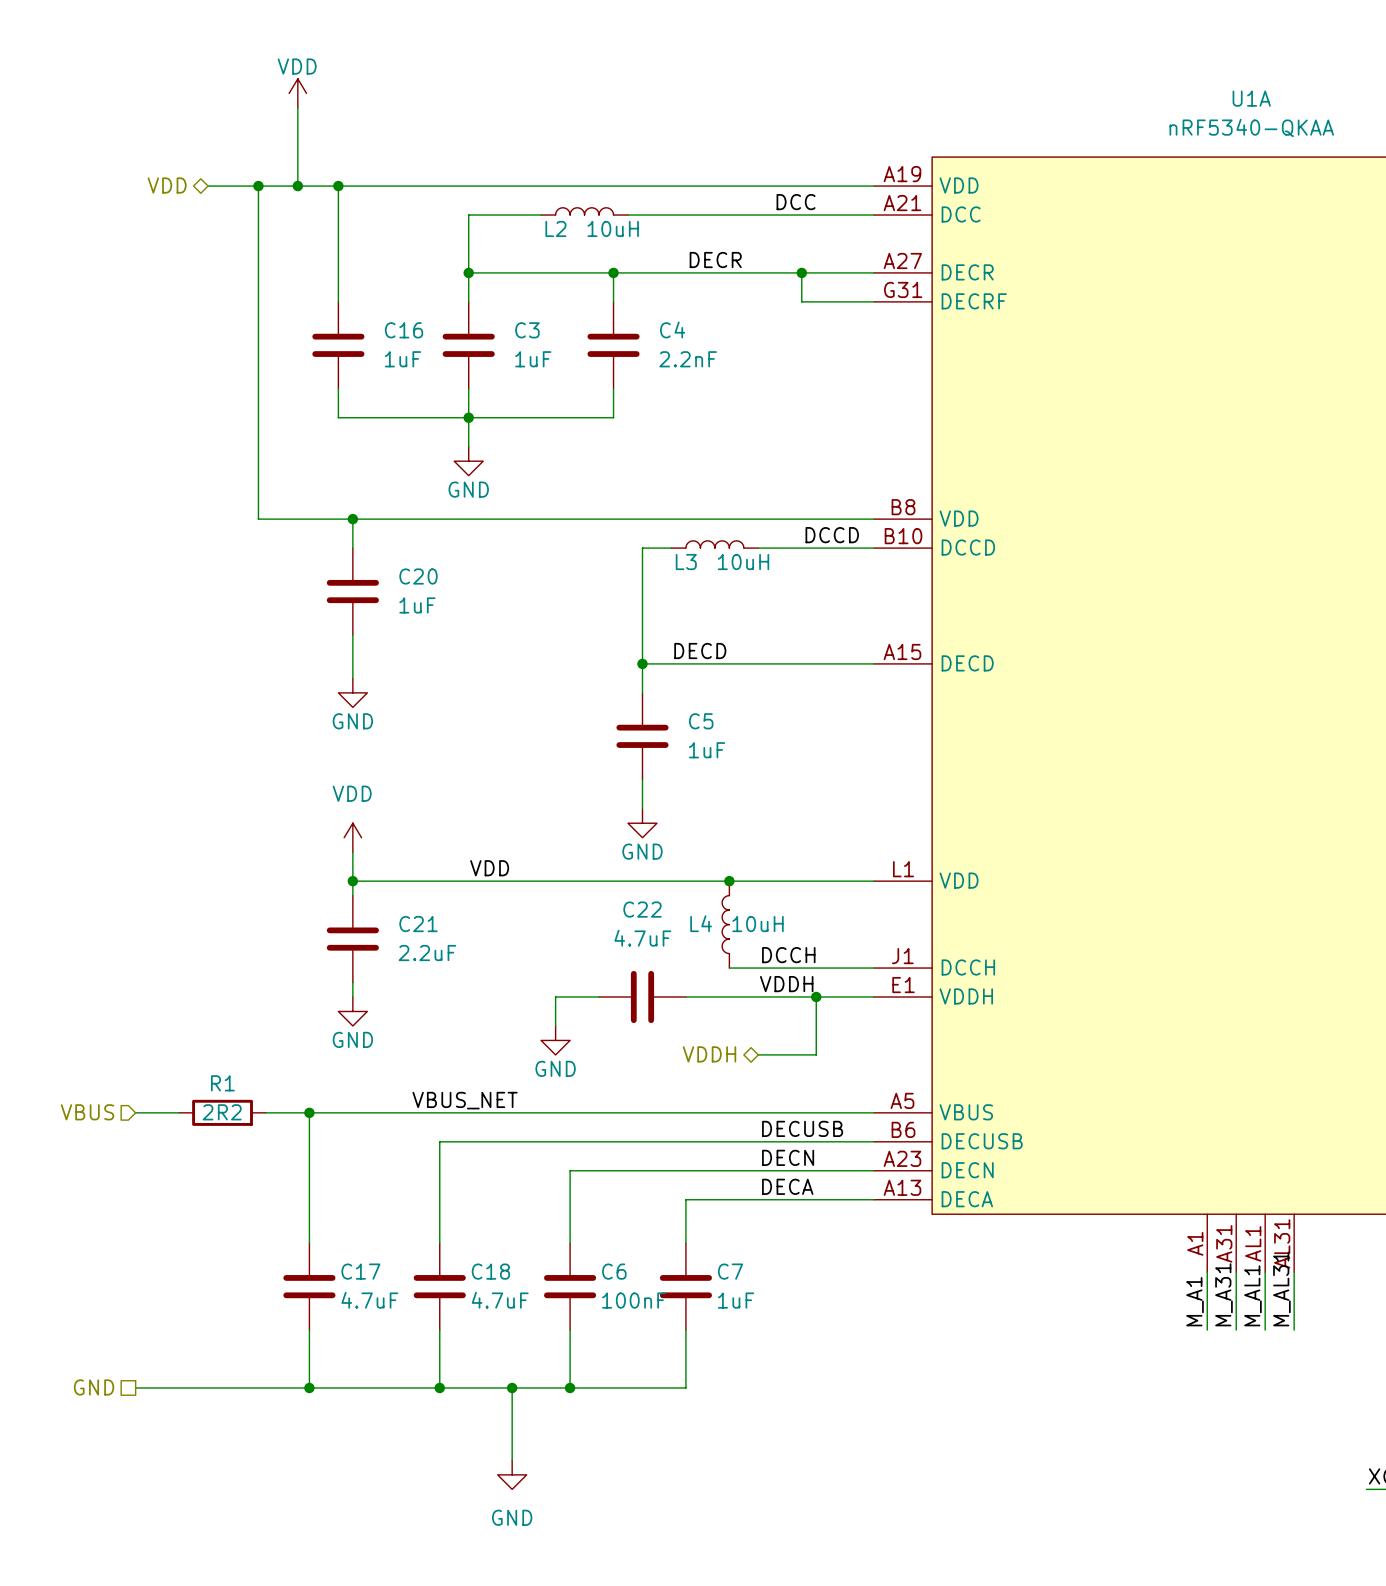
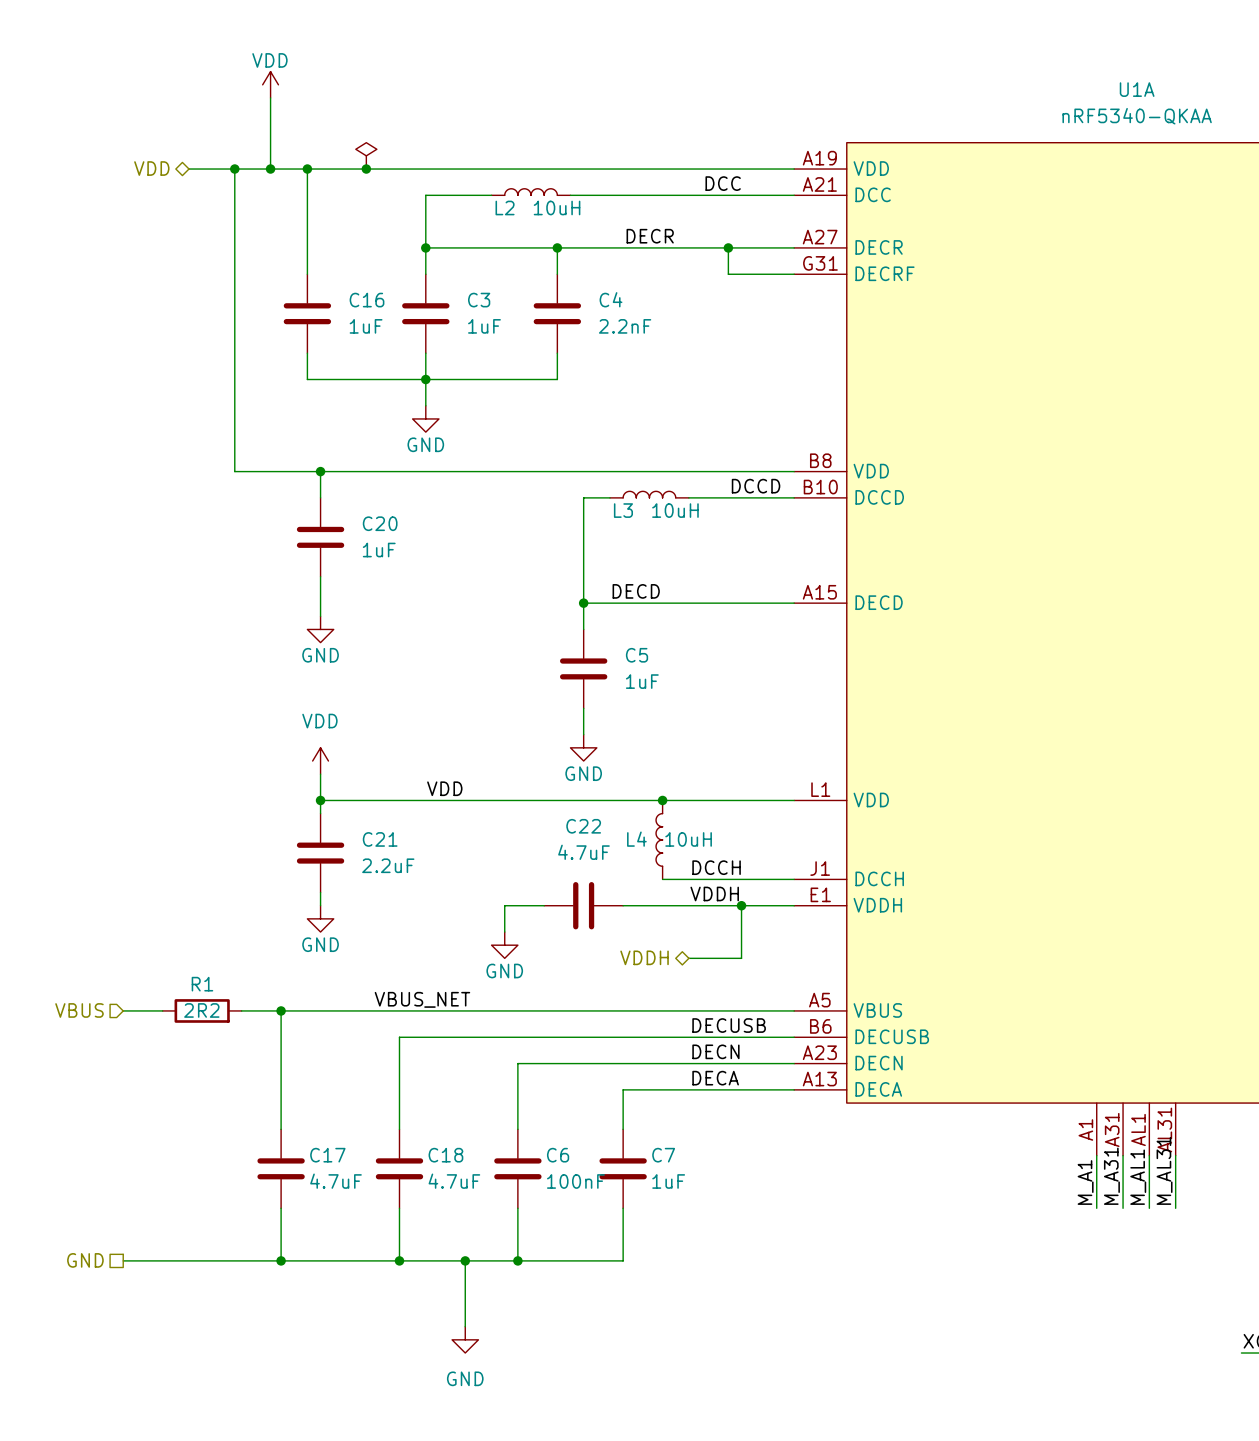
power symbol: none -> (366, 155)
junction: none -> (366, 169)

